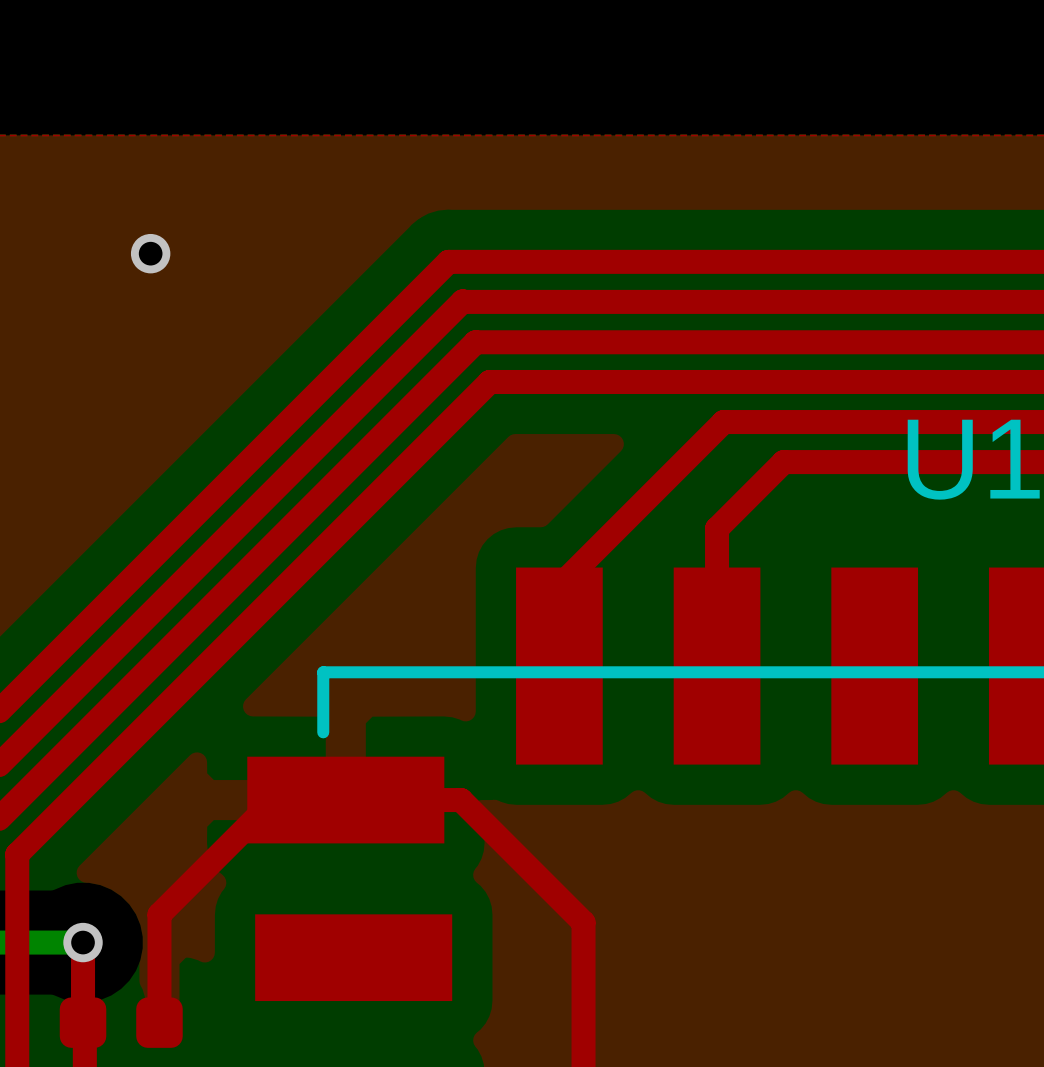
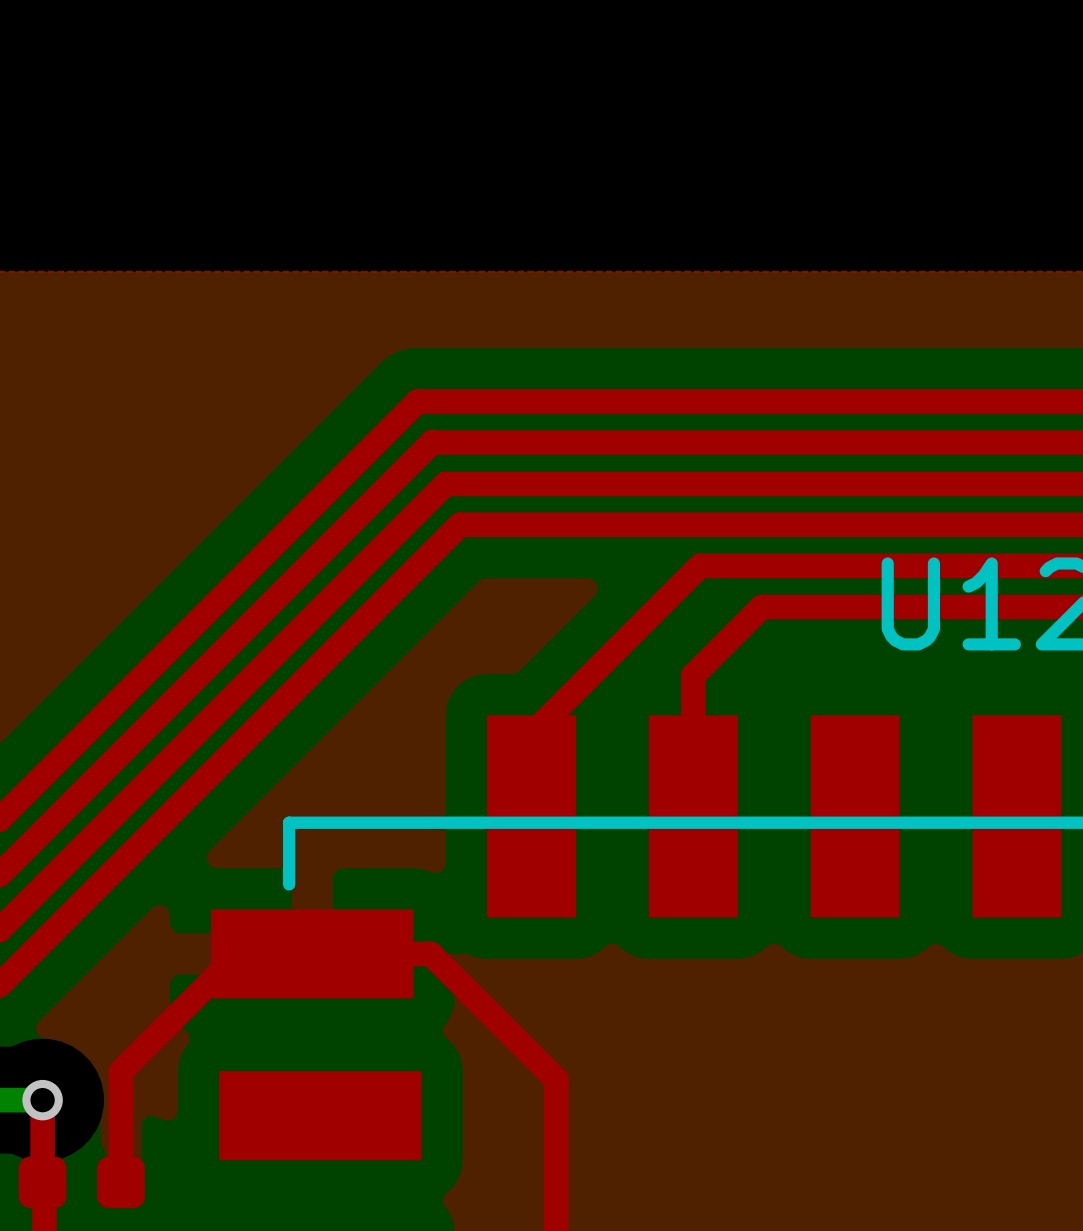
via: (150, 253) -> none

